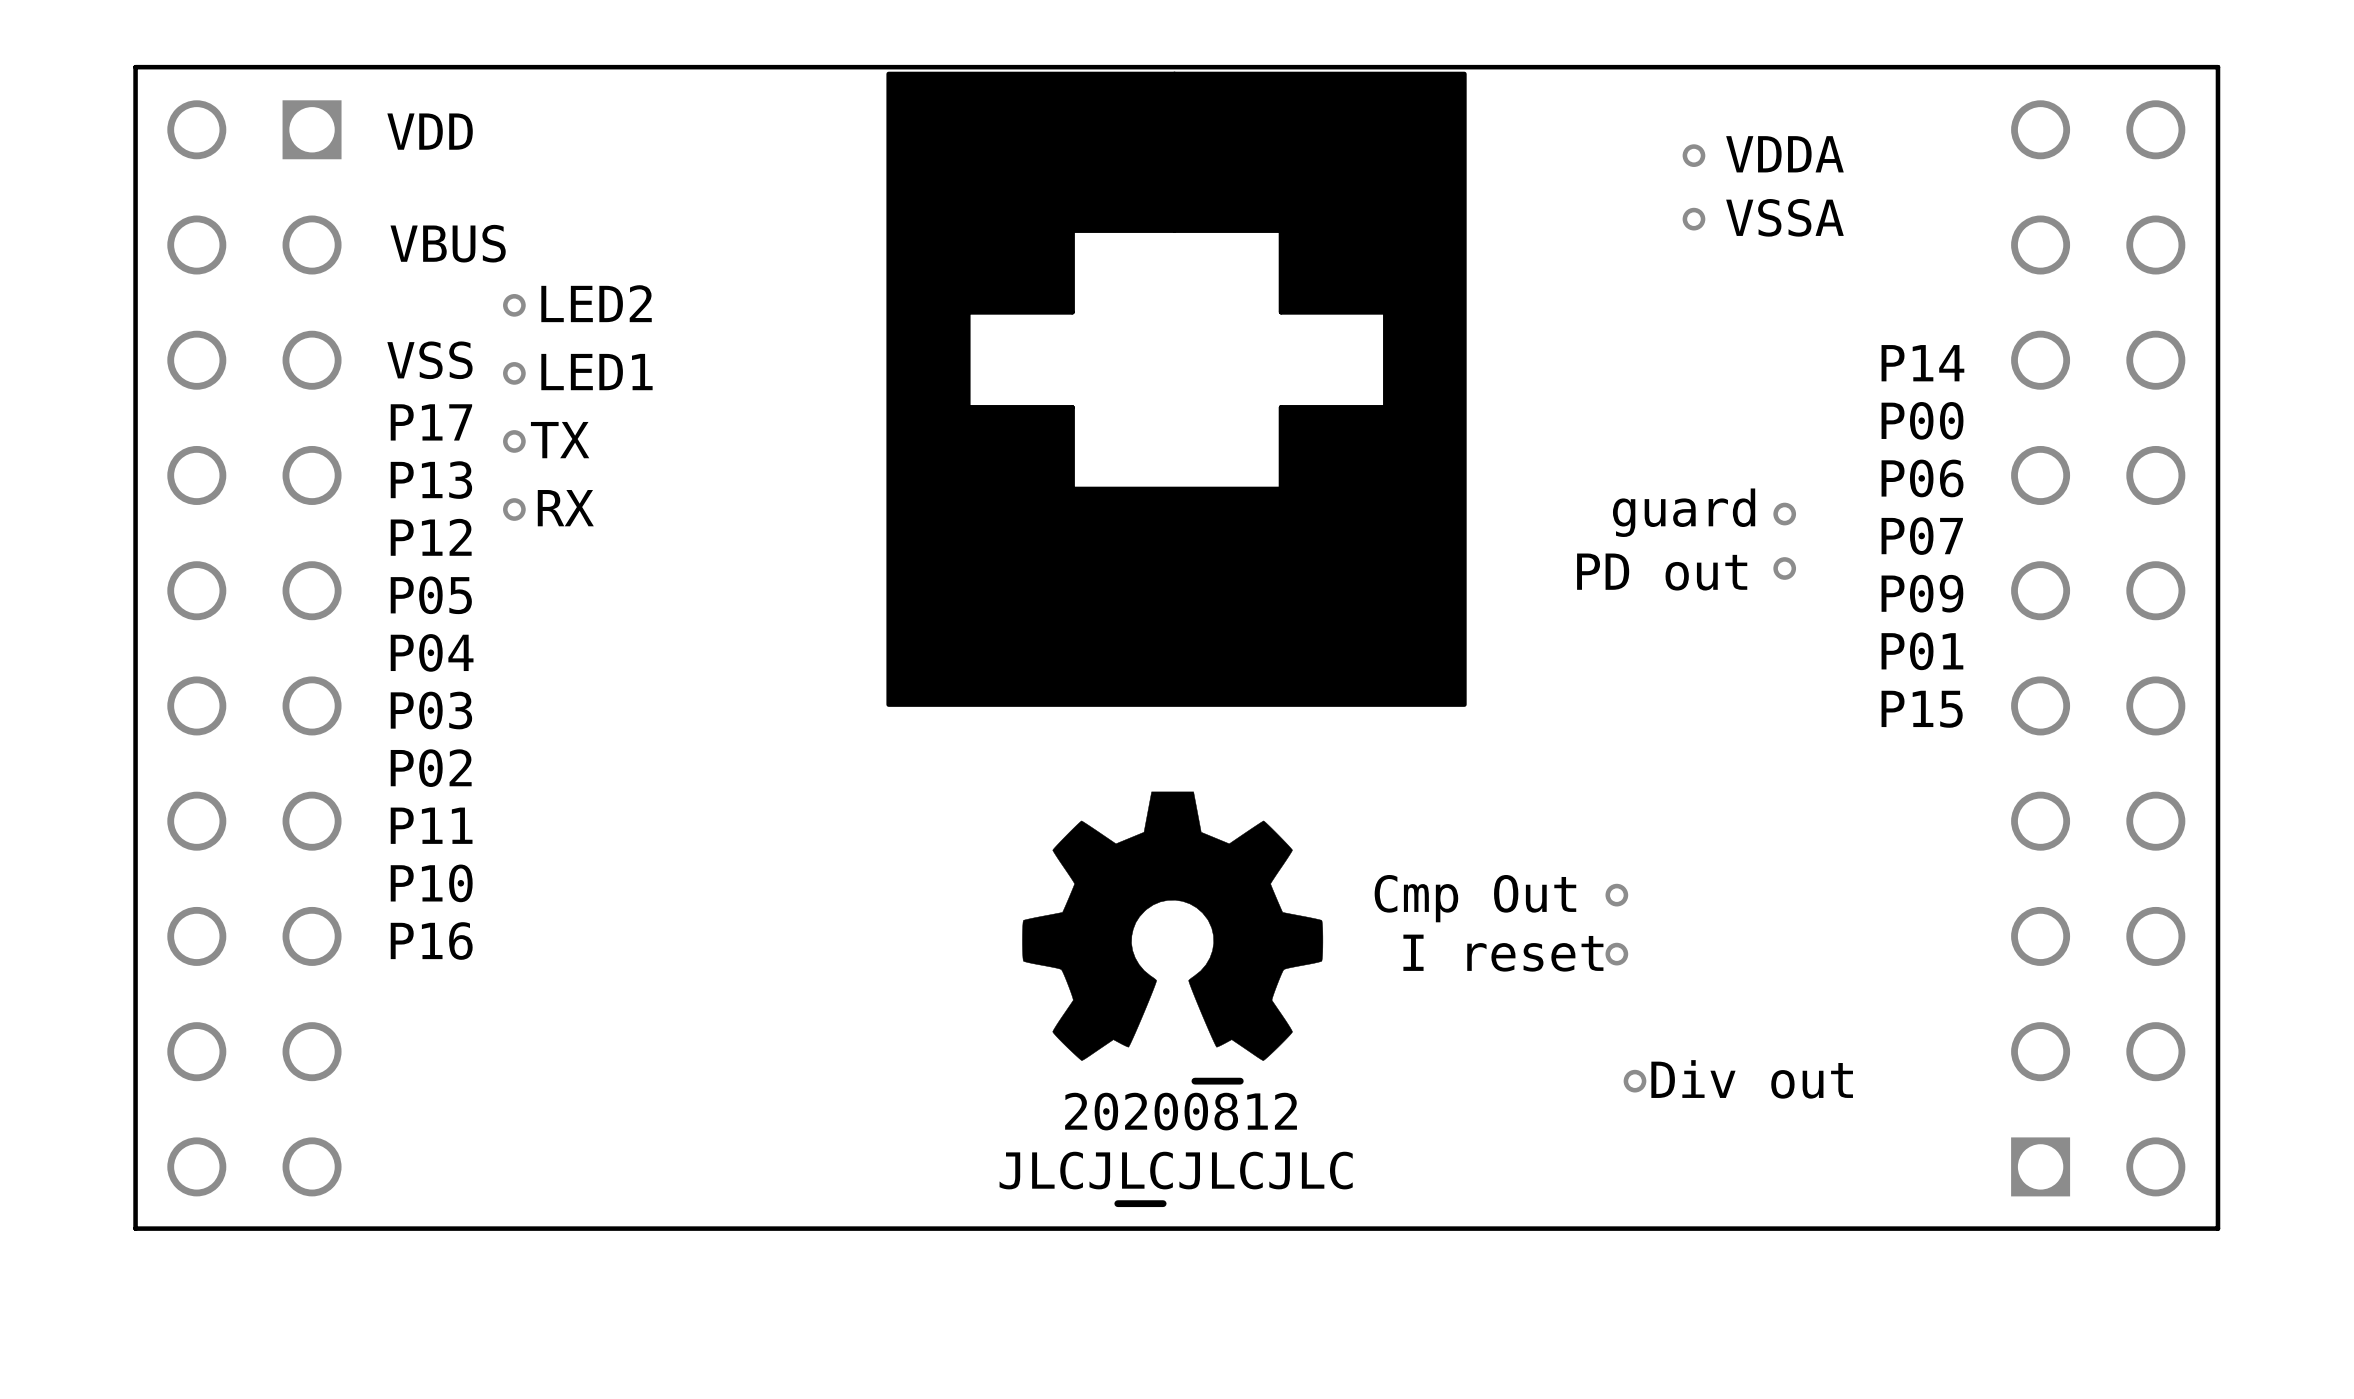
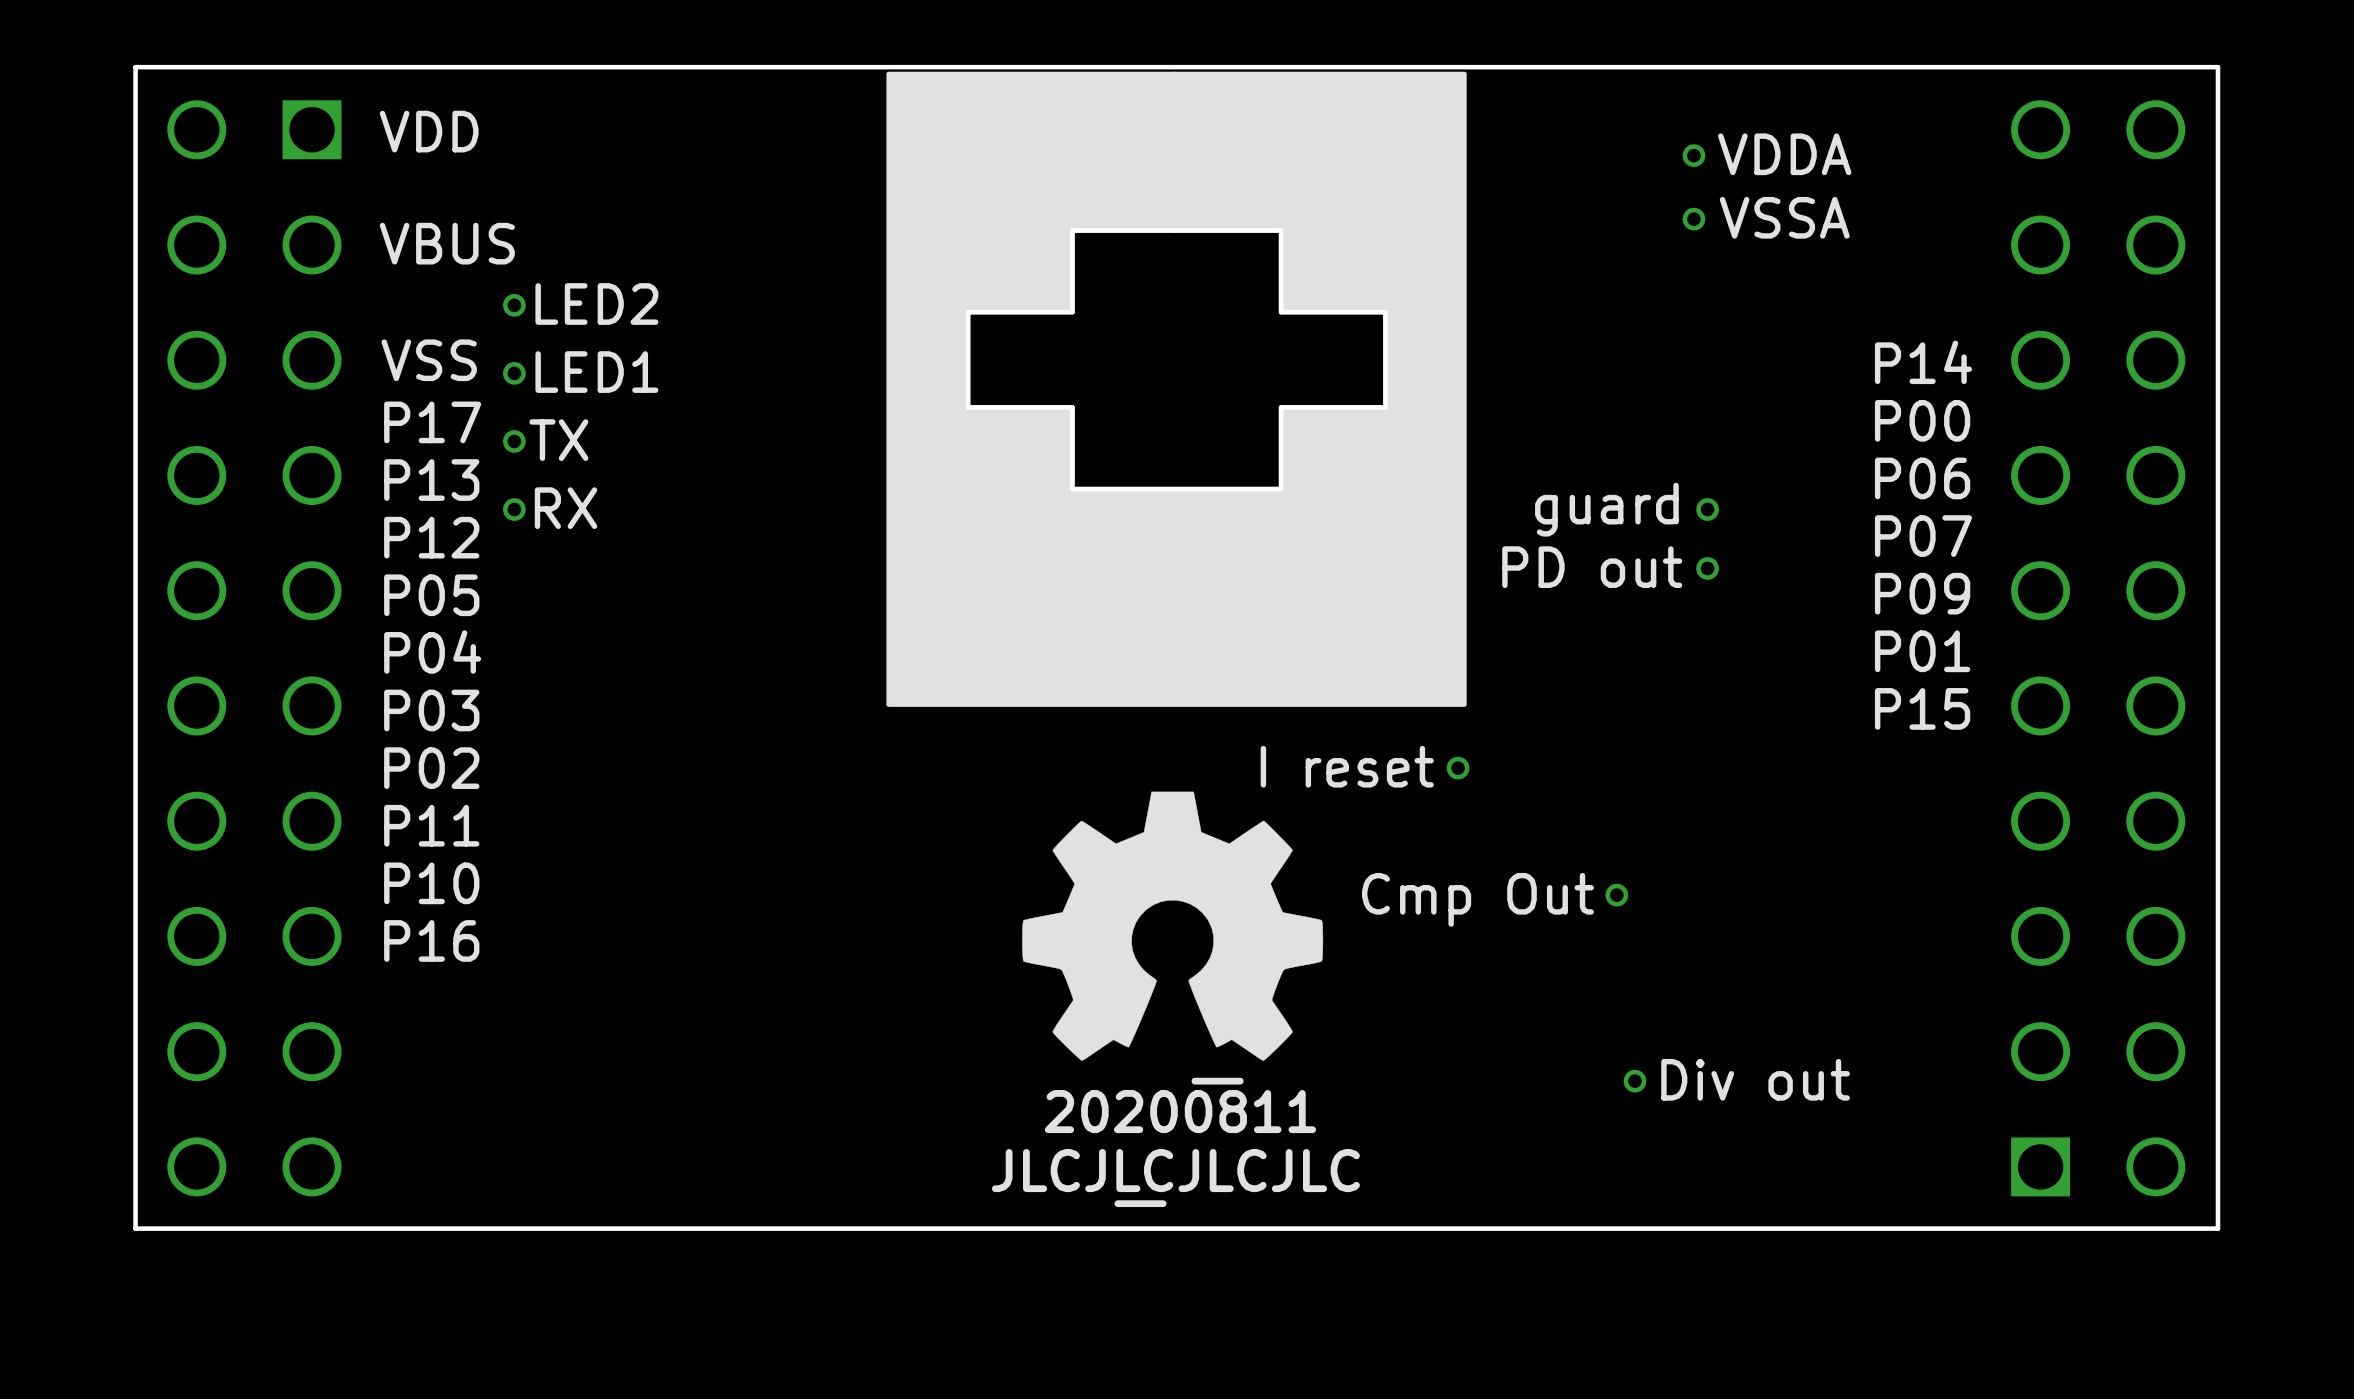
part position: (1784, 514) -> (1707, 509)
part position: (1784, 568) -> (1707, 568)
part value position: PD out (1662, 572) -> PD out (1592, 567)
part position: (1616, 954) -> (1458, 768)
drawing shape: [1065, 1077, 1297, 1131] -> [1044, 1077, 1317, 1134]

